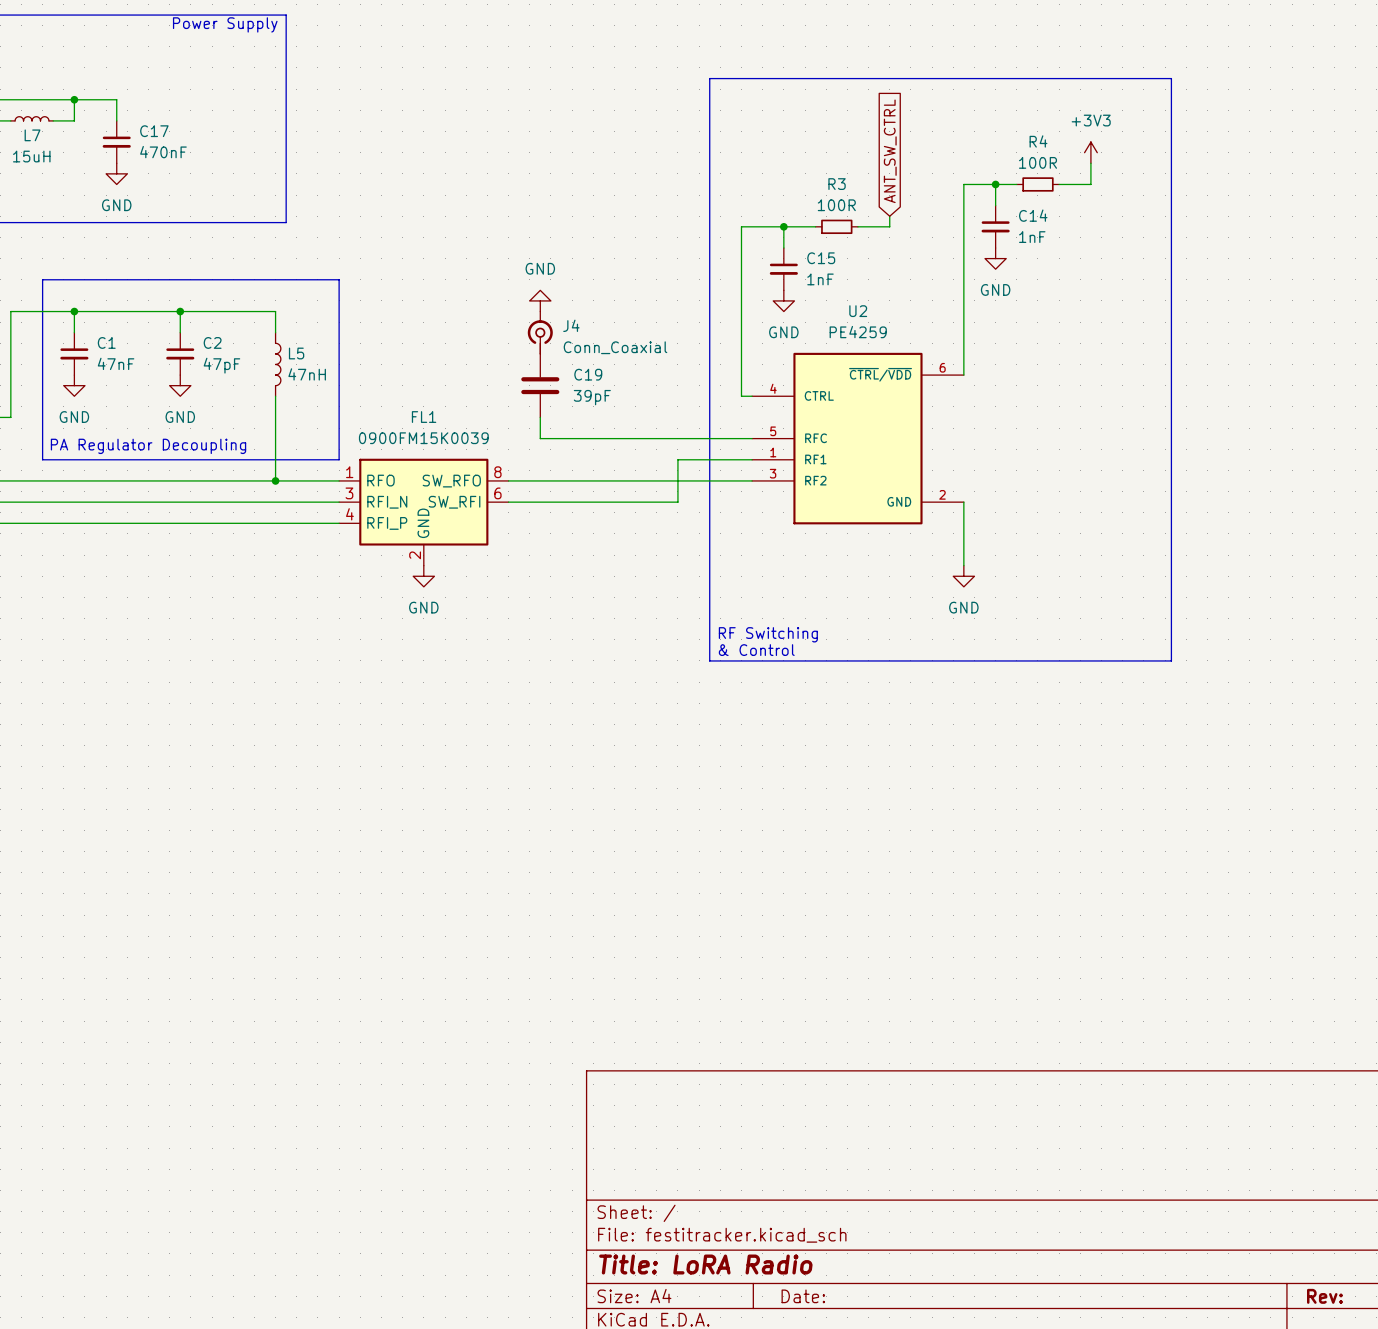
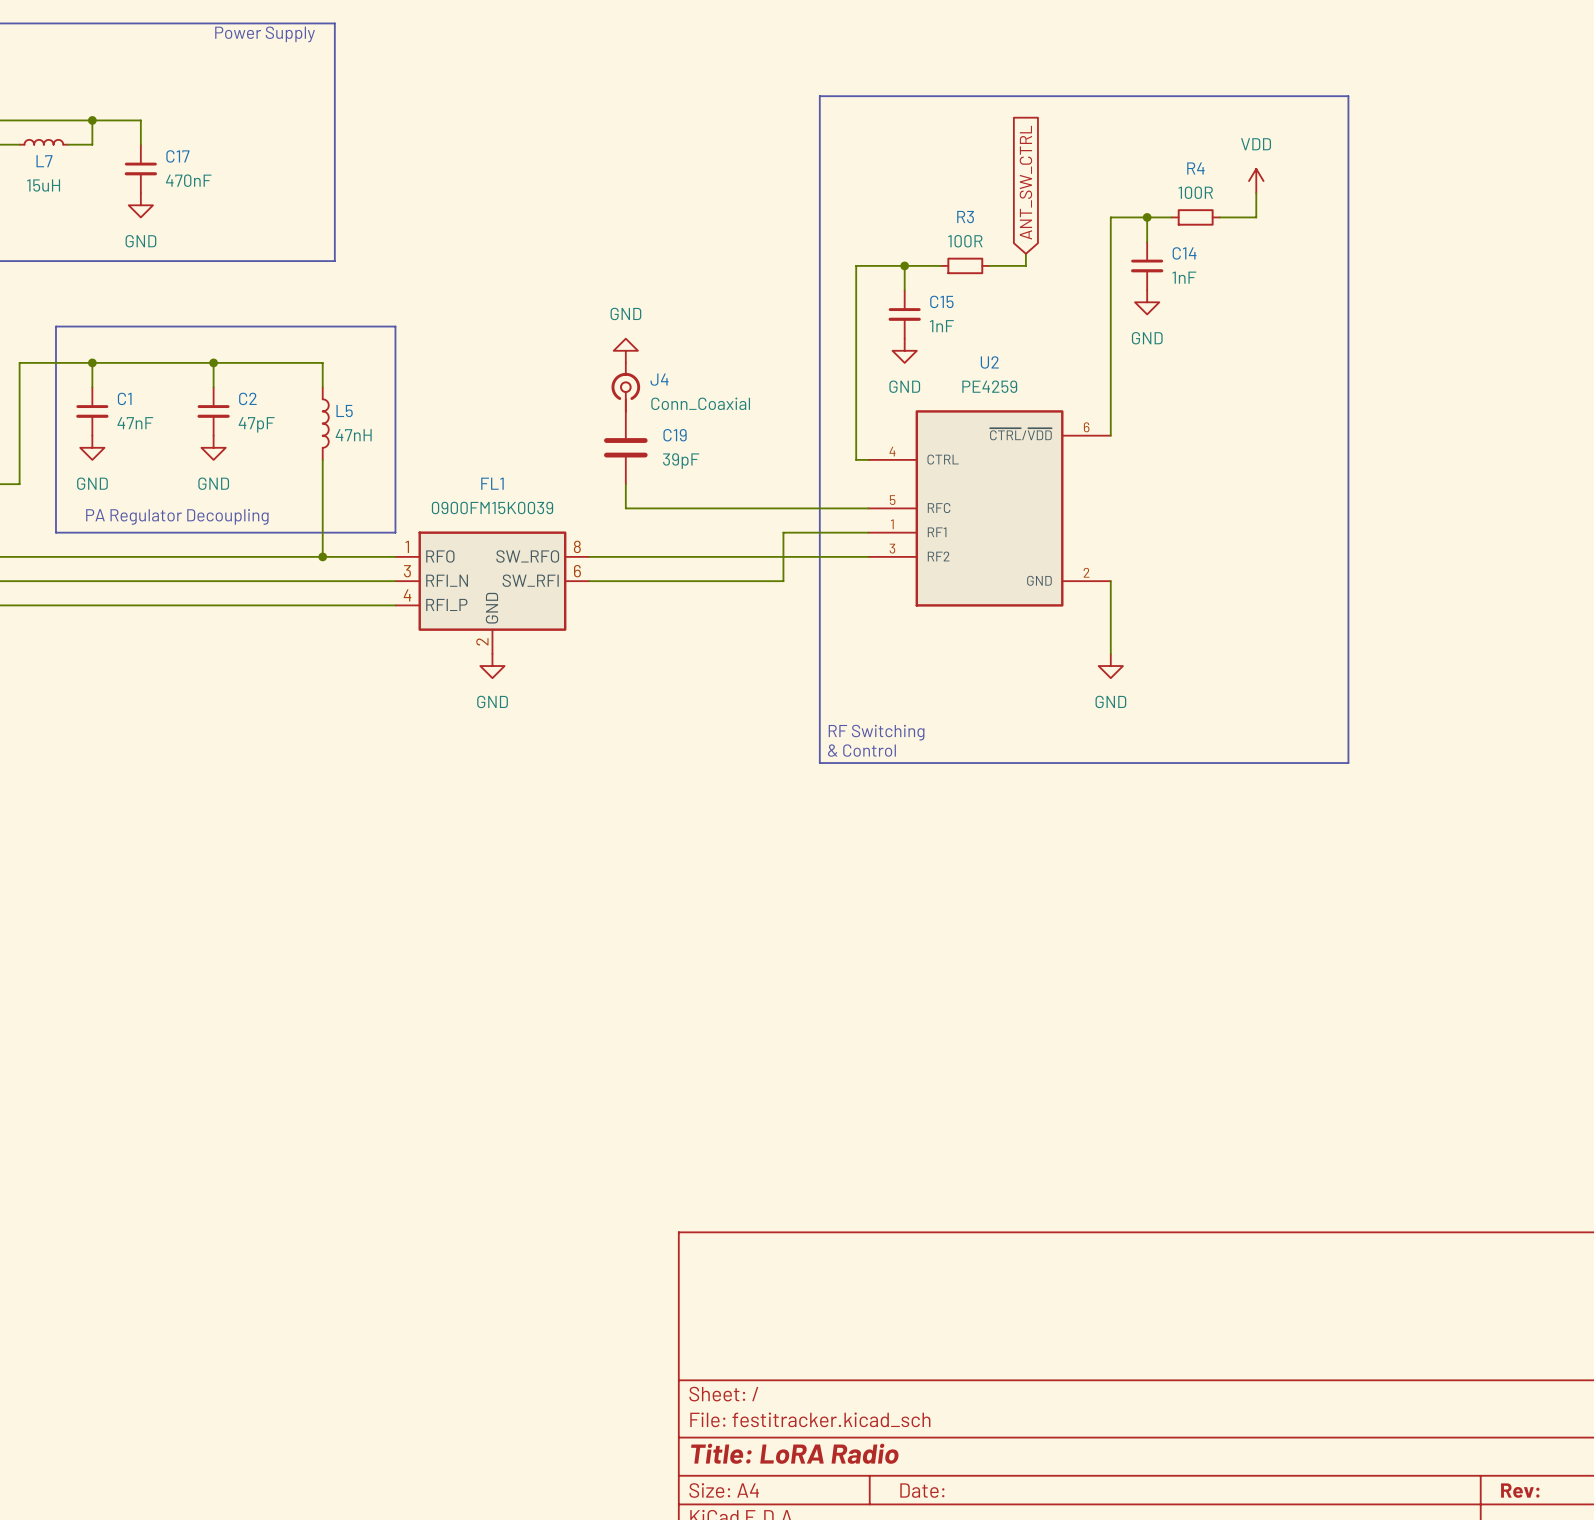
power symbol: +3V3 (1090, 152) -> VDD (1256, 181)

